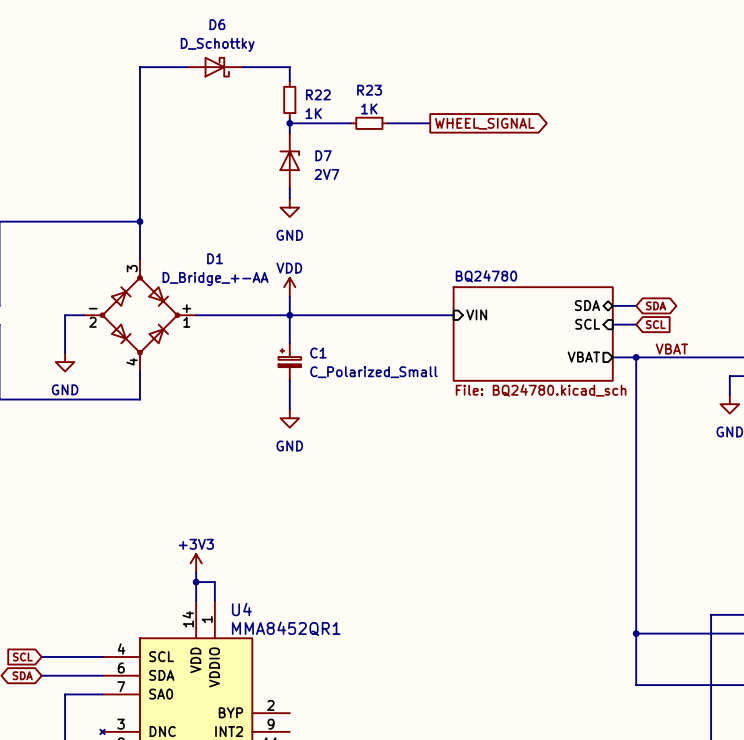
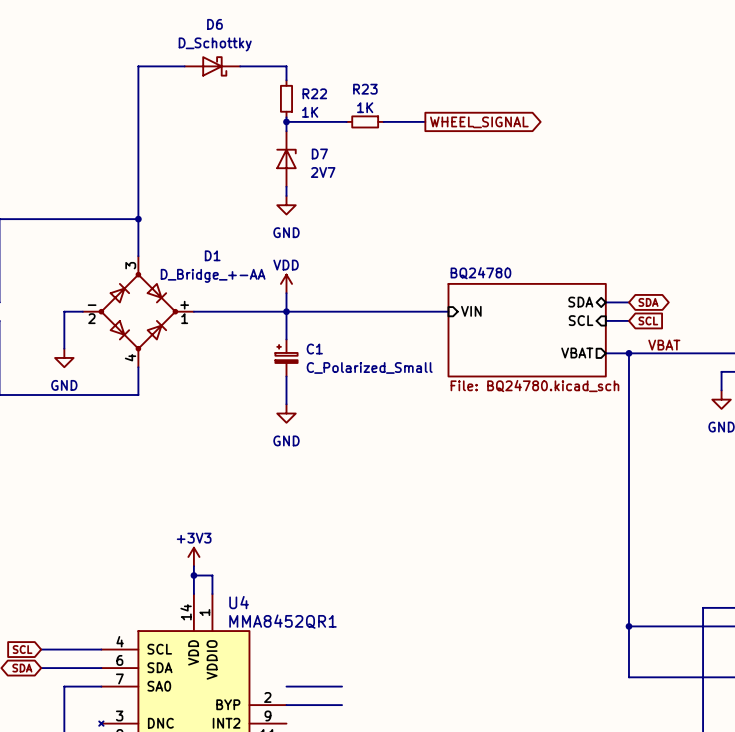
wire: none -> (286, 686) (342, 686)
wire: none -> (286, 705) (342, 705)

